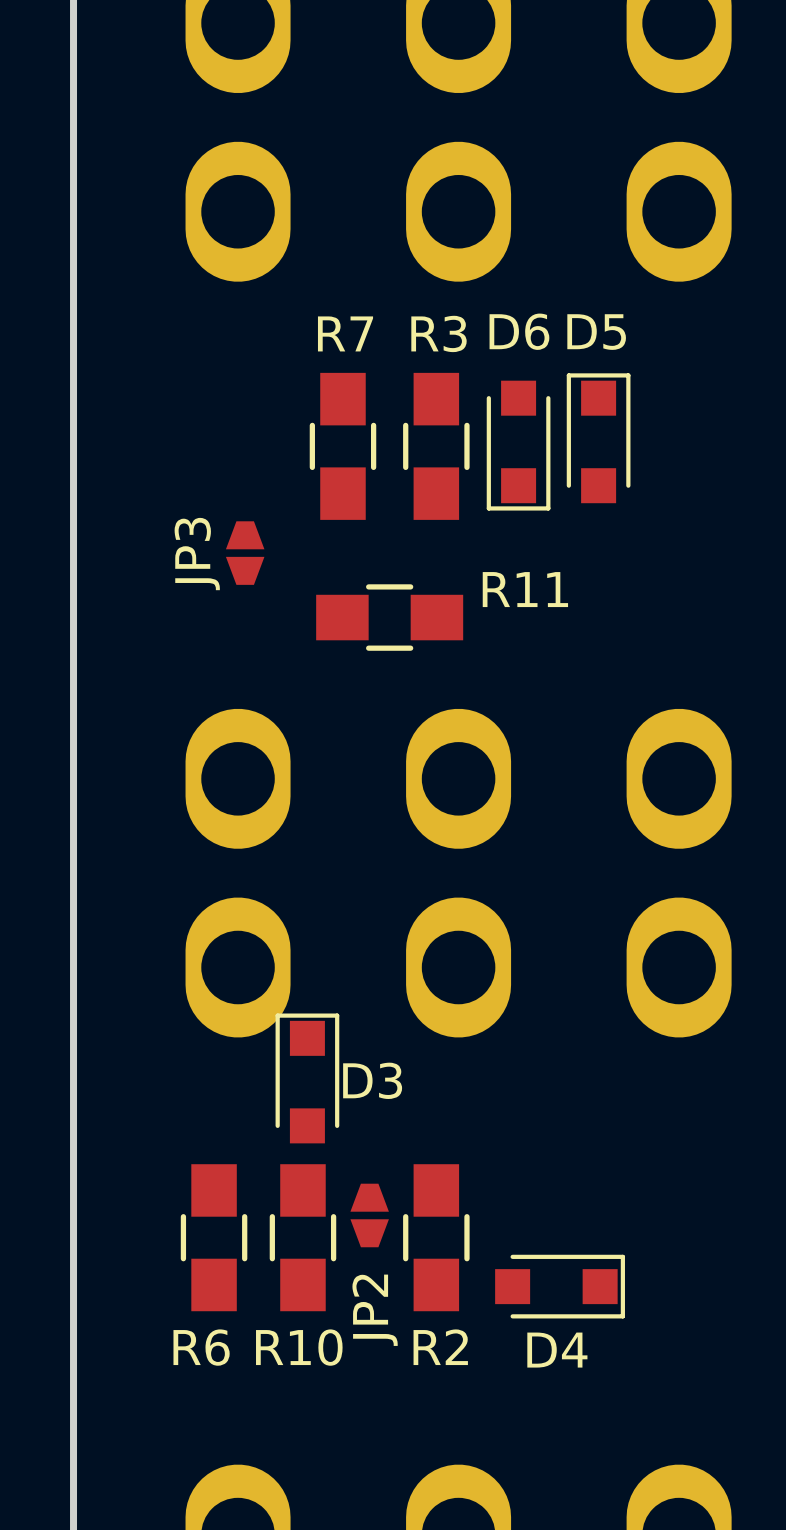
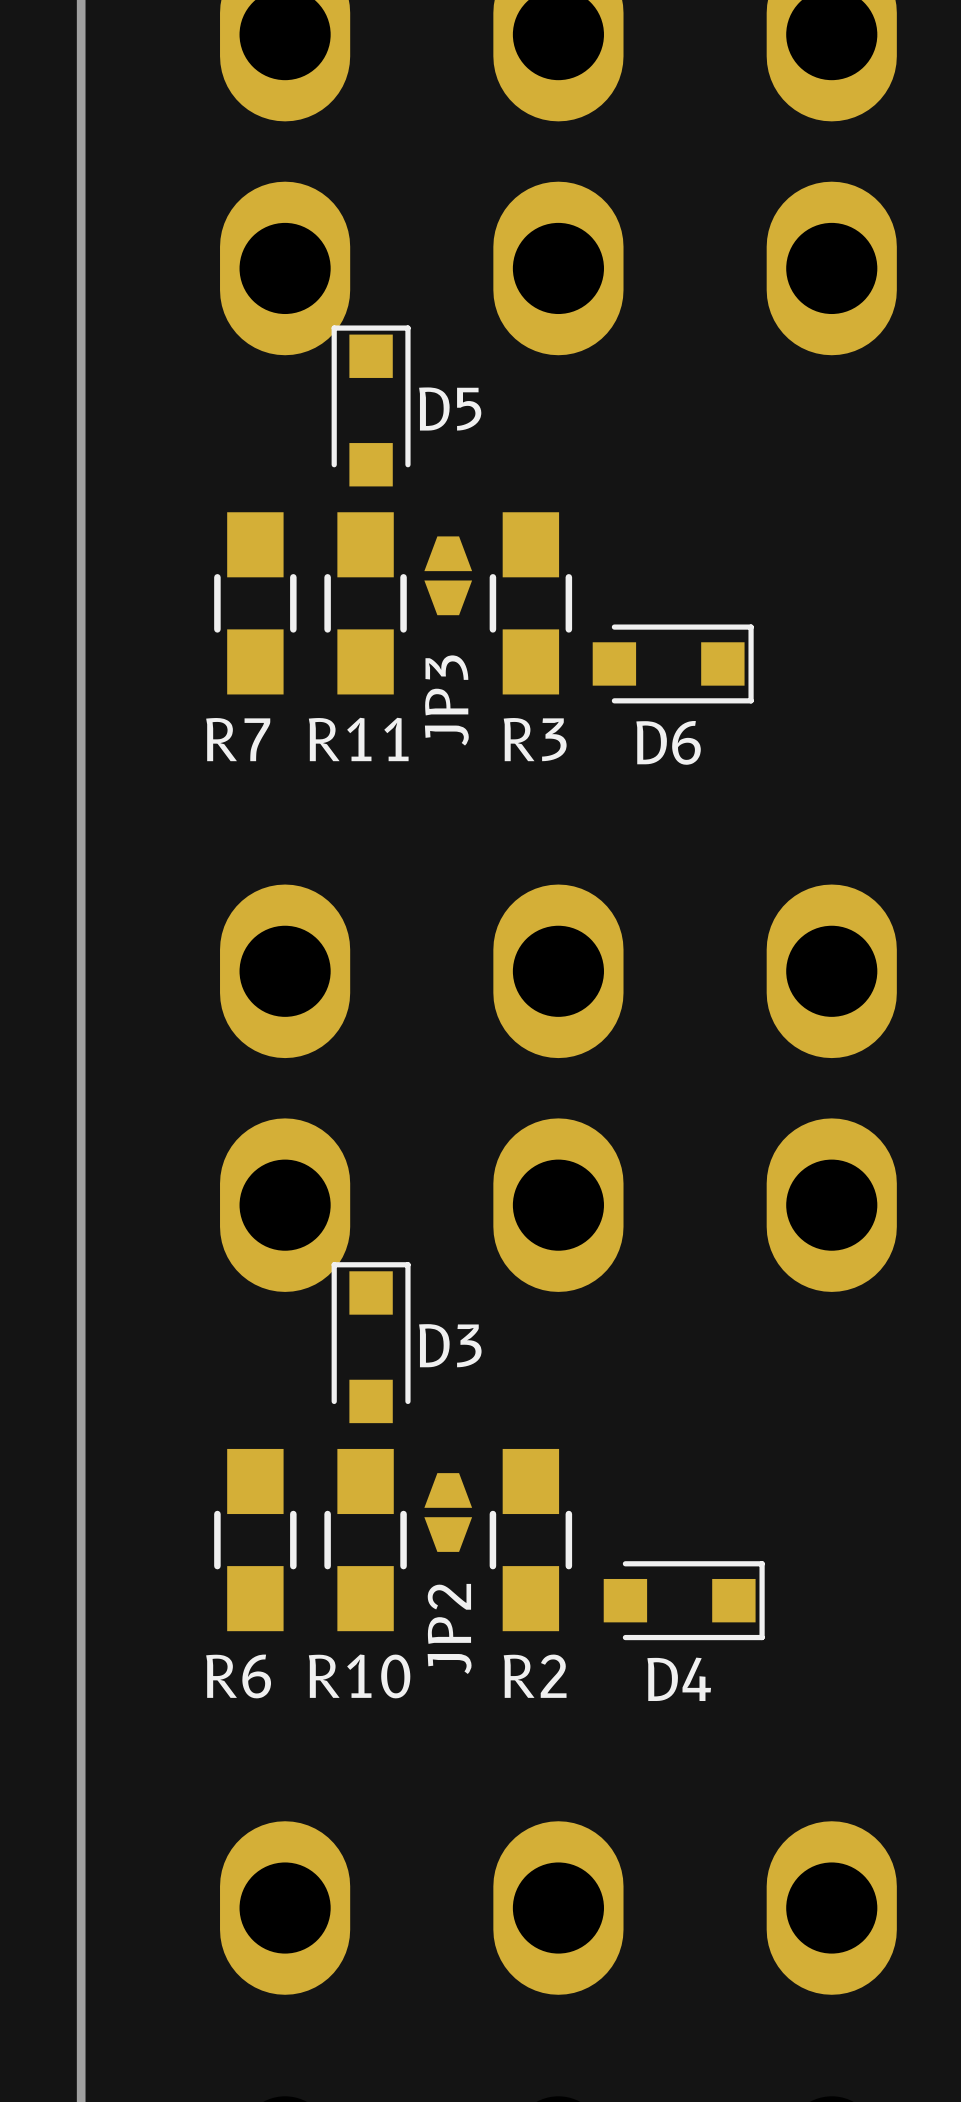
D6 name position: D6 (519, 331) -> D6 (668, 742)
D5 name position: D5 (596, 332) -> D5 (450, 409)
R7 name position: R7 (345, 333) -> R7 (238, 739)
R3 name position: R3 (439, 333) -> R3 (535, 739)
D5 position: (598, 438) -> (371, 405)
D6 rotation: 0° (518, 445) -> 90° counterclockwise (673, 663)
D6 position: (518, 445) -> (673, 663)
R7 position: (342, 446) -> (255, 603)
R3 position: (436, 446) -> (530, 603)
JP3 position: (245, 553) -> (448, 575)
JP3 name position: JP3 (197, 554) -> JP3 (446, 700)
R11 rotation: 0° (389, 617) -> 90° clockwise (365, 603)
R11 position: (389, 617) -> (365, 603)

